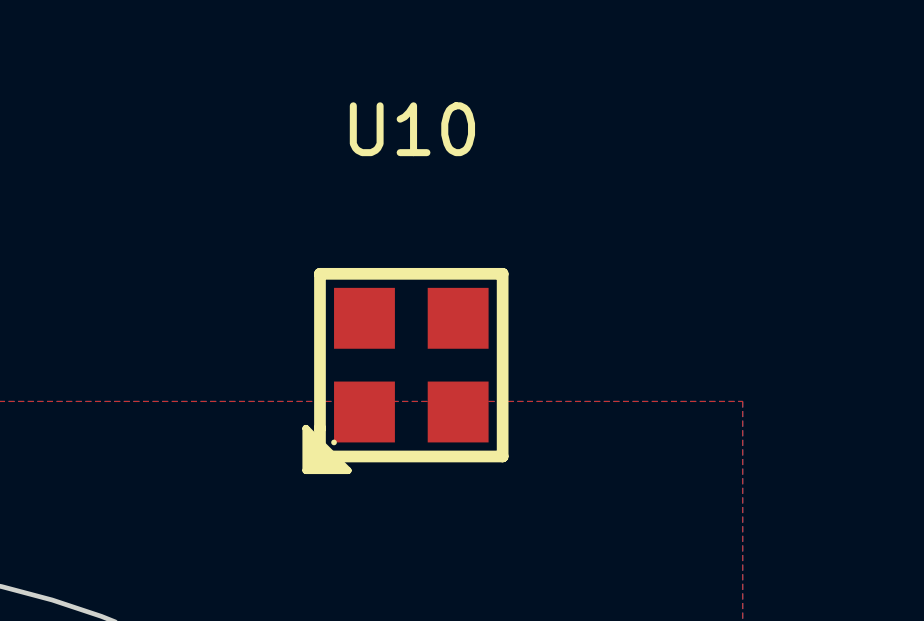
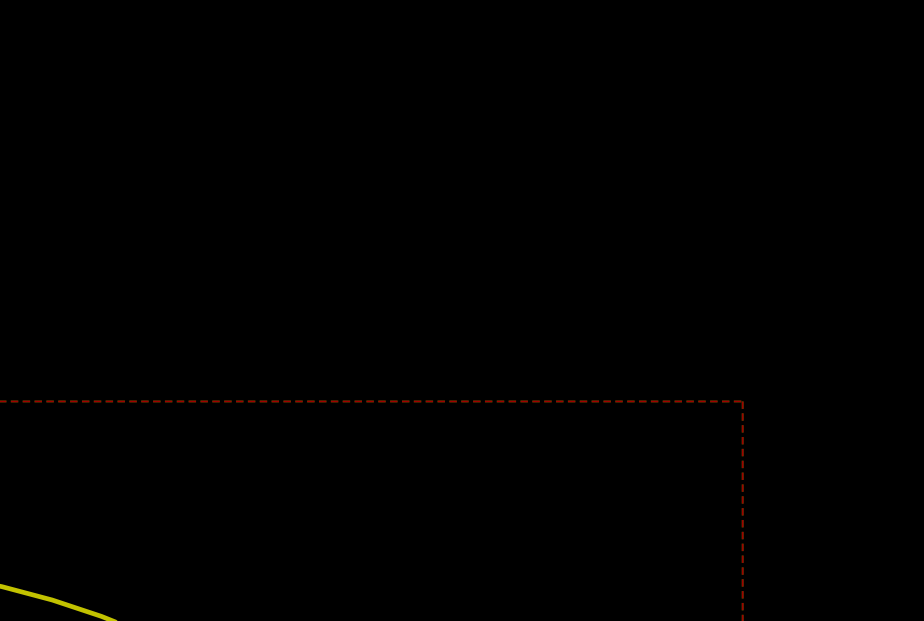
U10: (405, 371) -> none

